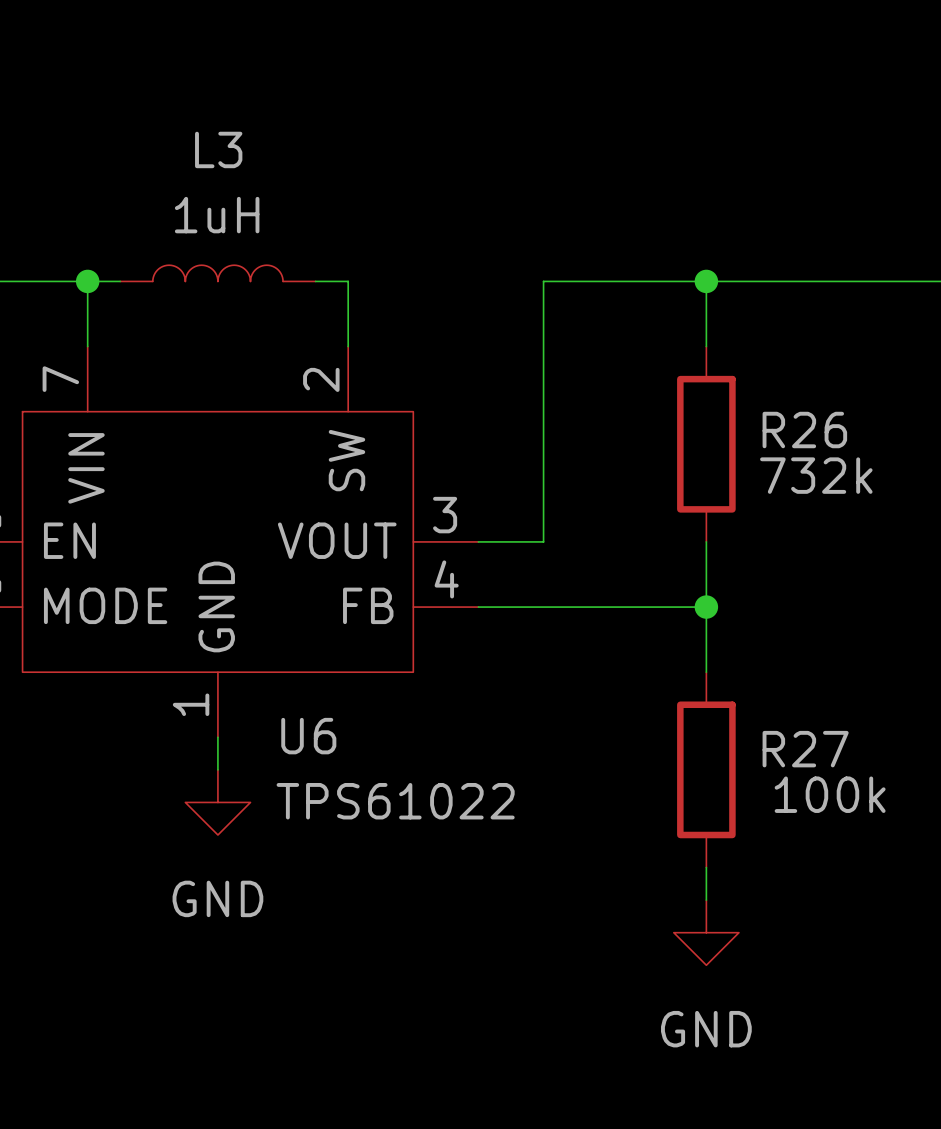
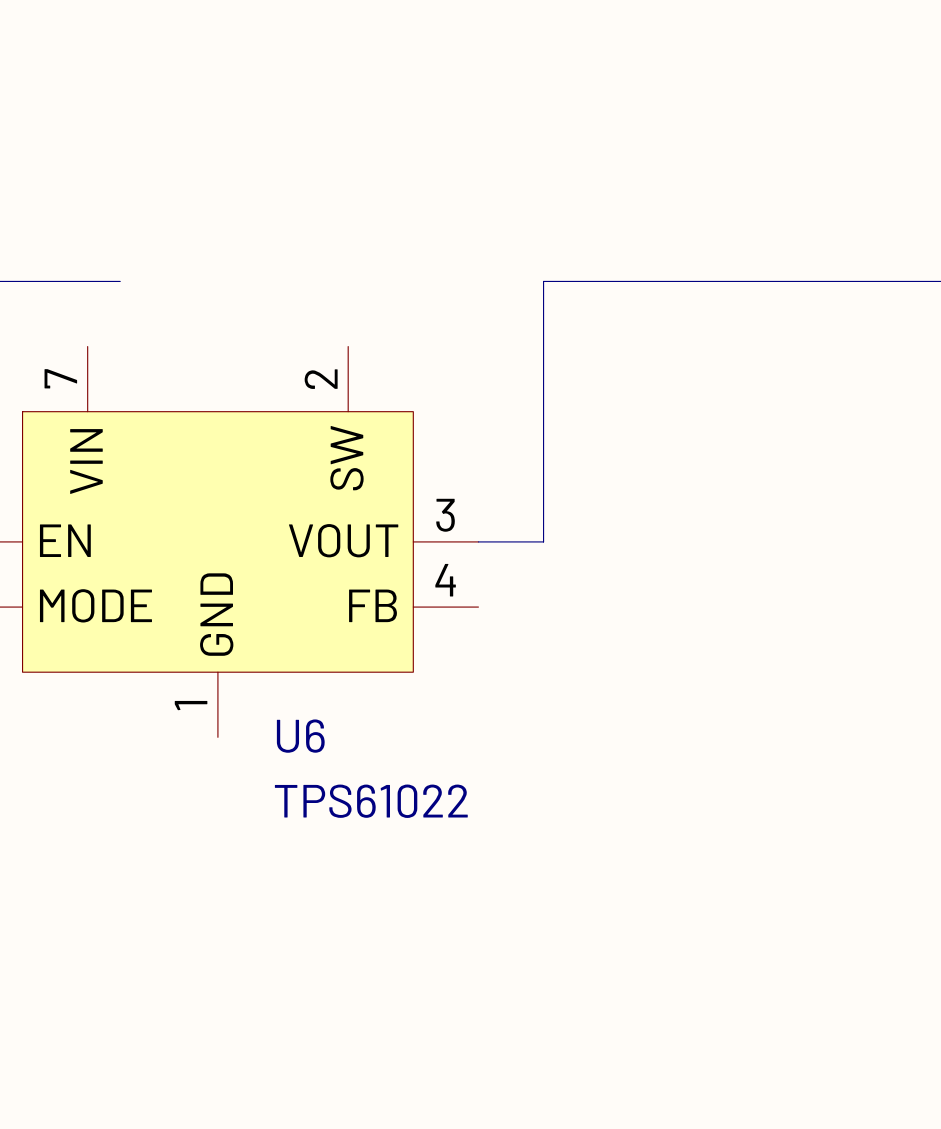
L3: 1uH (217, 273) -> none
wire: (87, 281) (87, 346) -> none
junction: (87, 281) -> none
wire: (315, 281) (348, 281) (348, 346) -> none
wire: (706, 281) (706, 346) -> none
junction: (706, 281) -> none
R26: 732k (706, 444) -> none
wire: (706, 541) (706, 672) -> none
wire: (478, 607) (706, 607) -> none
junction: (706, 607) -> none
wire: (217, 737) (217, 769) -> none
R27: 100k (706, 769) -> none
power symbol: GND (217, 802) -> none
wire: (706, 867) (706, 900) -> none
power symbol: GND (706, 932) -> none

